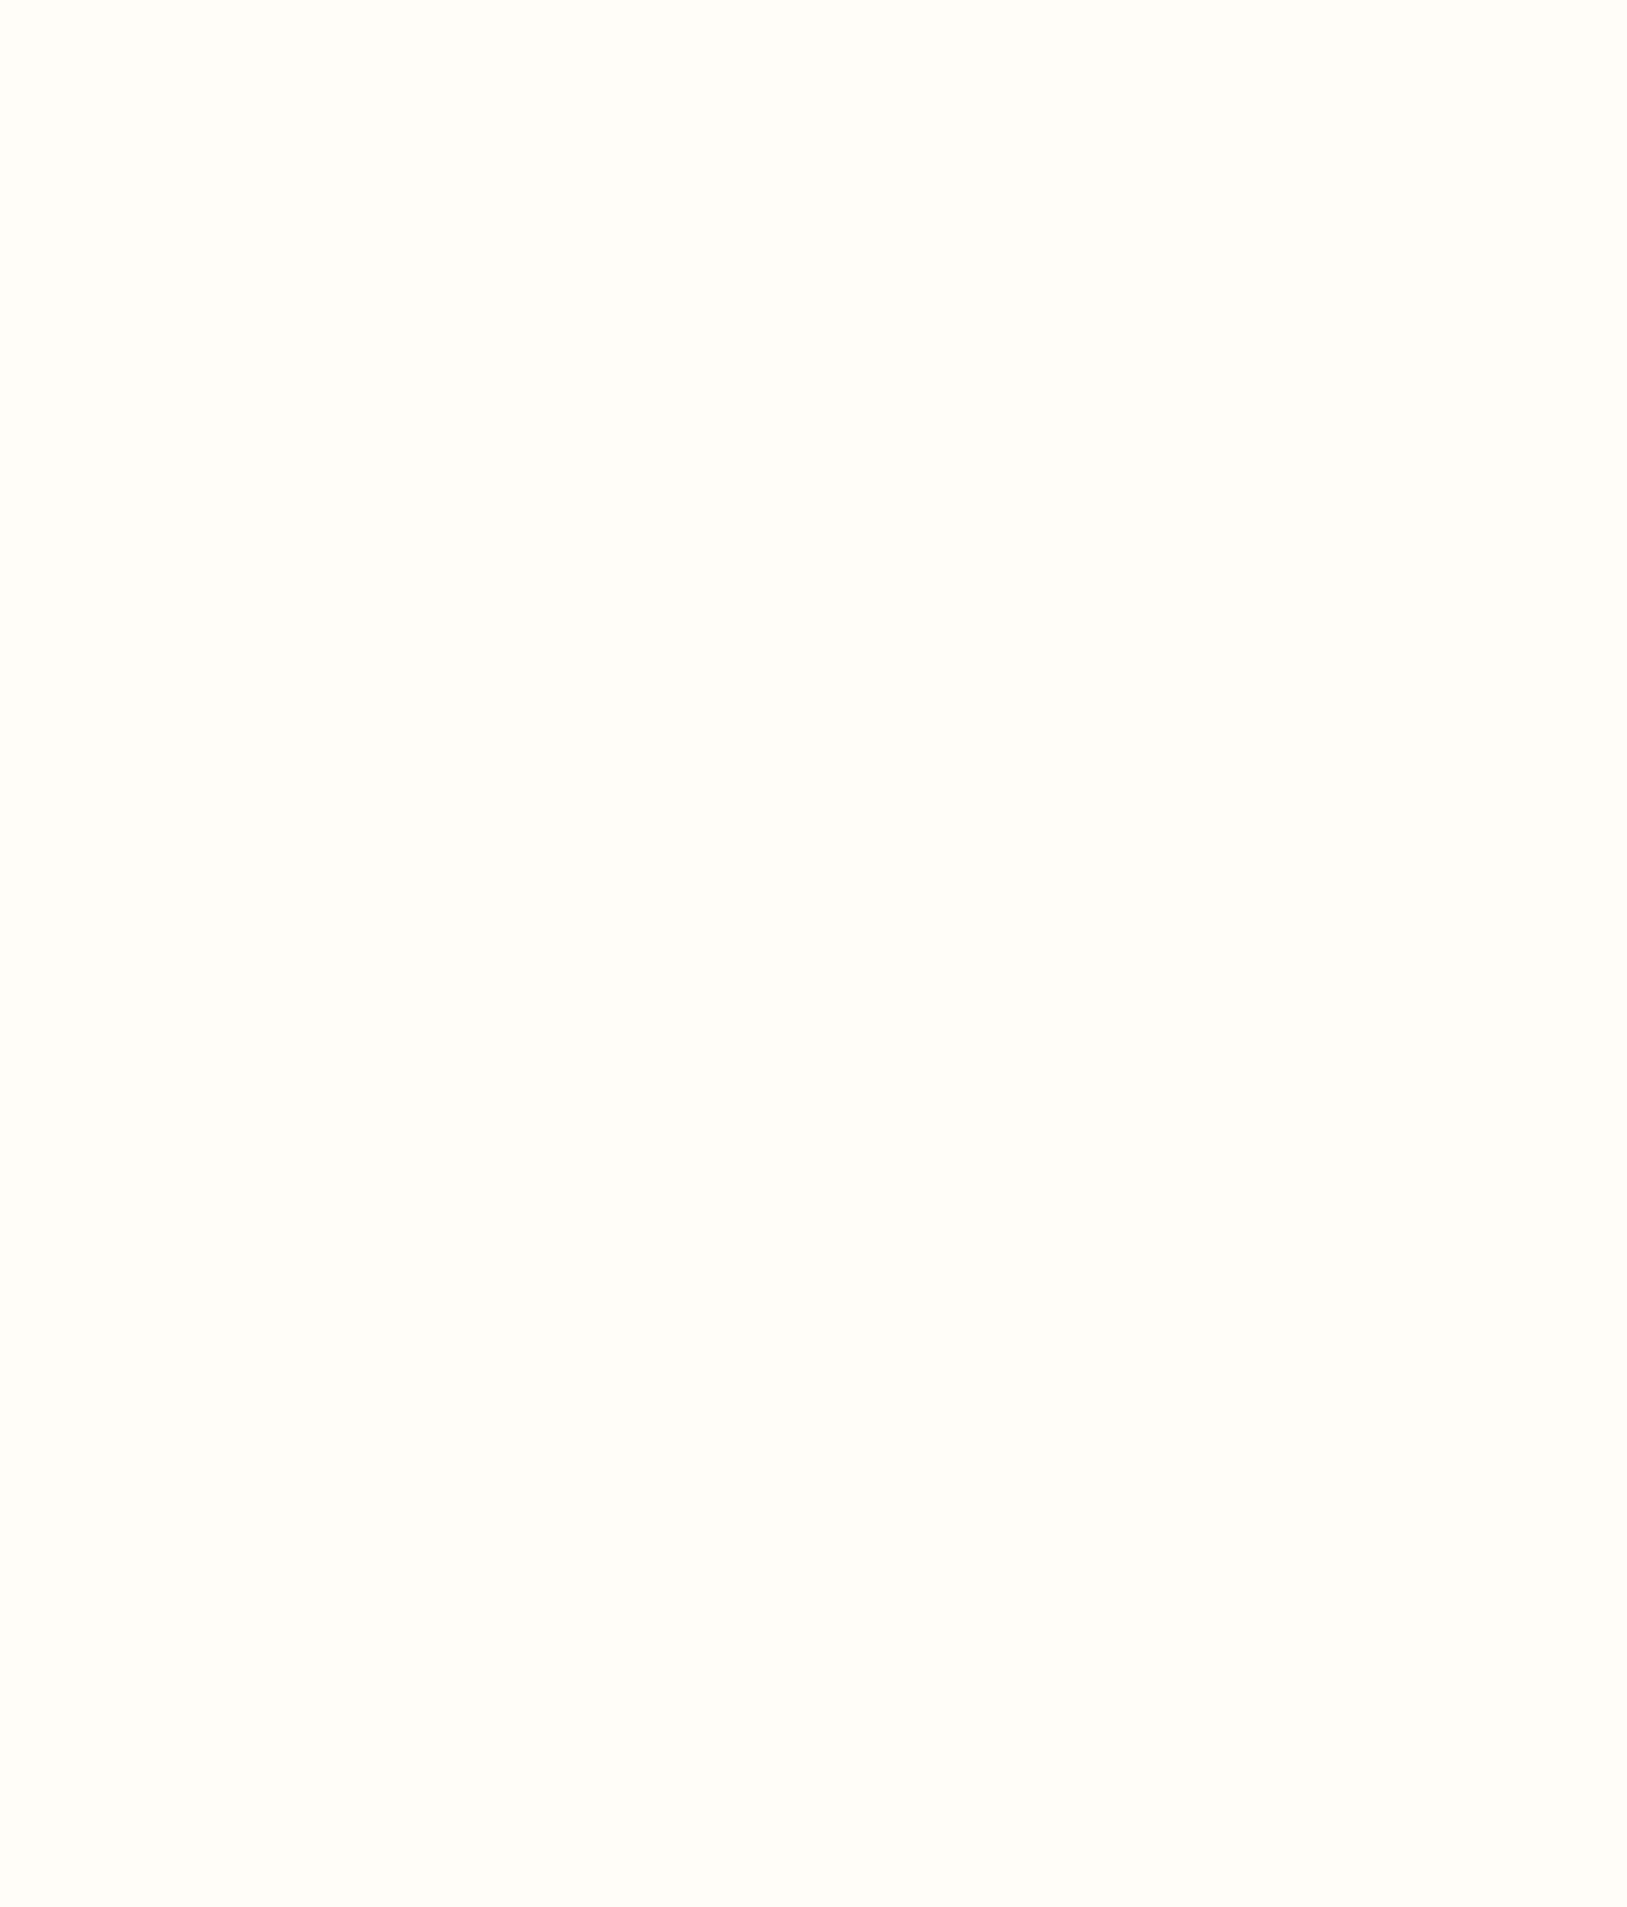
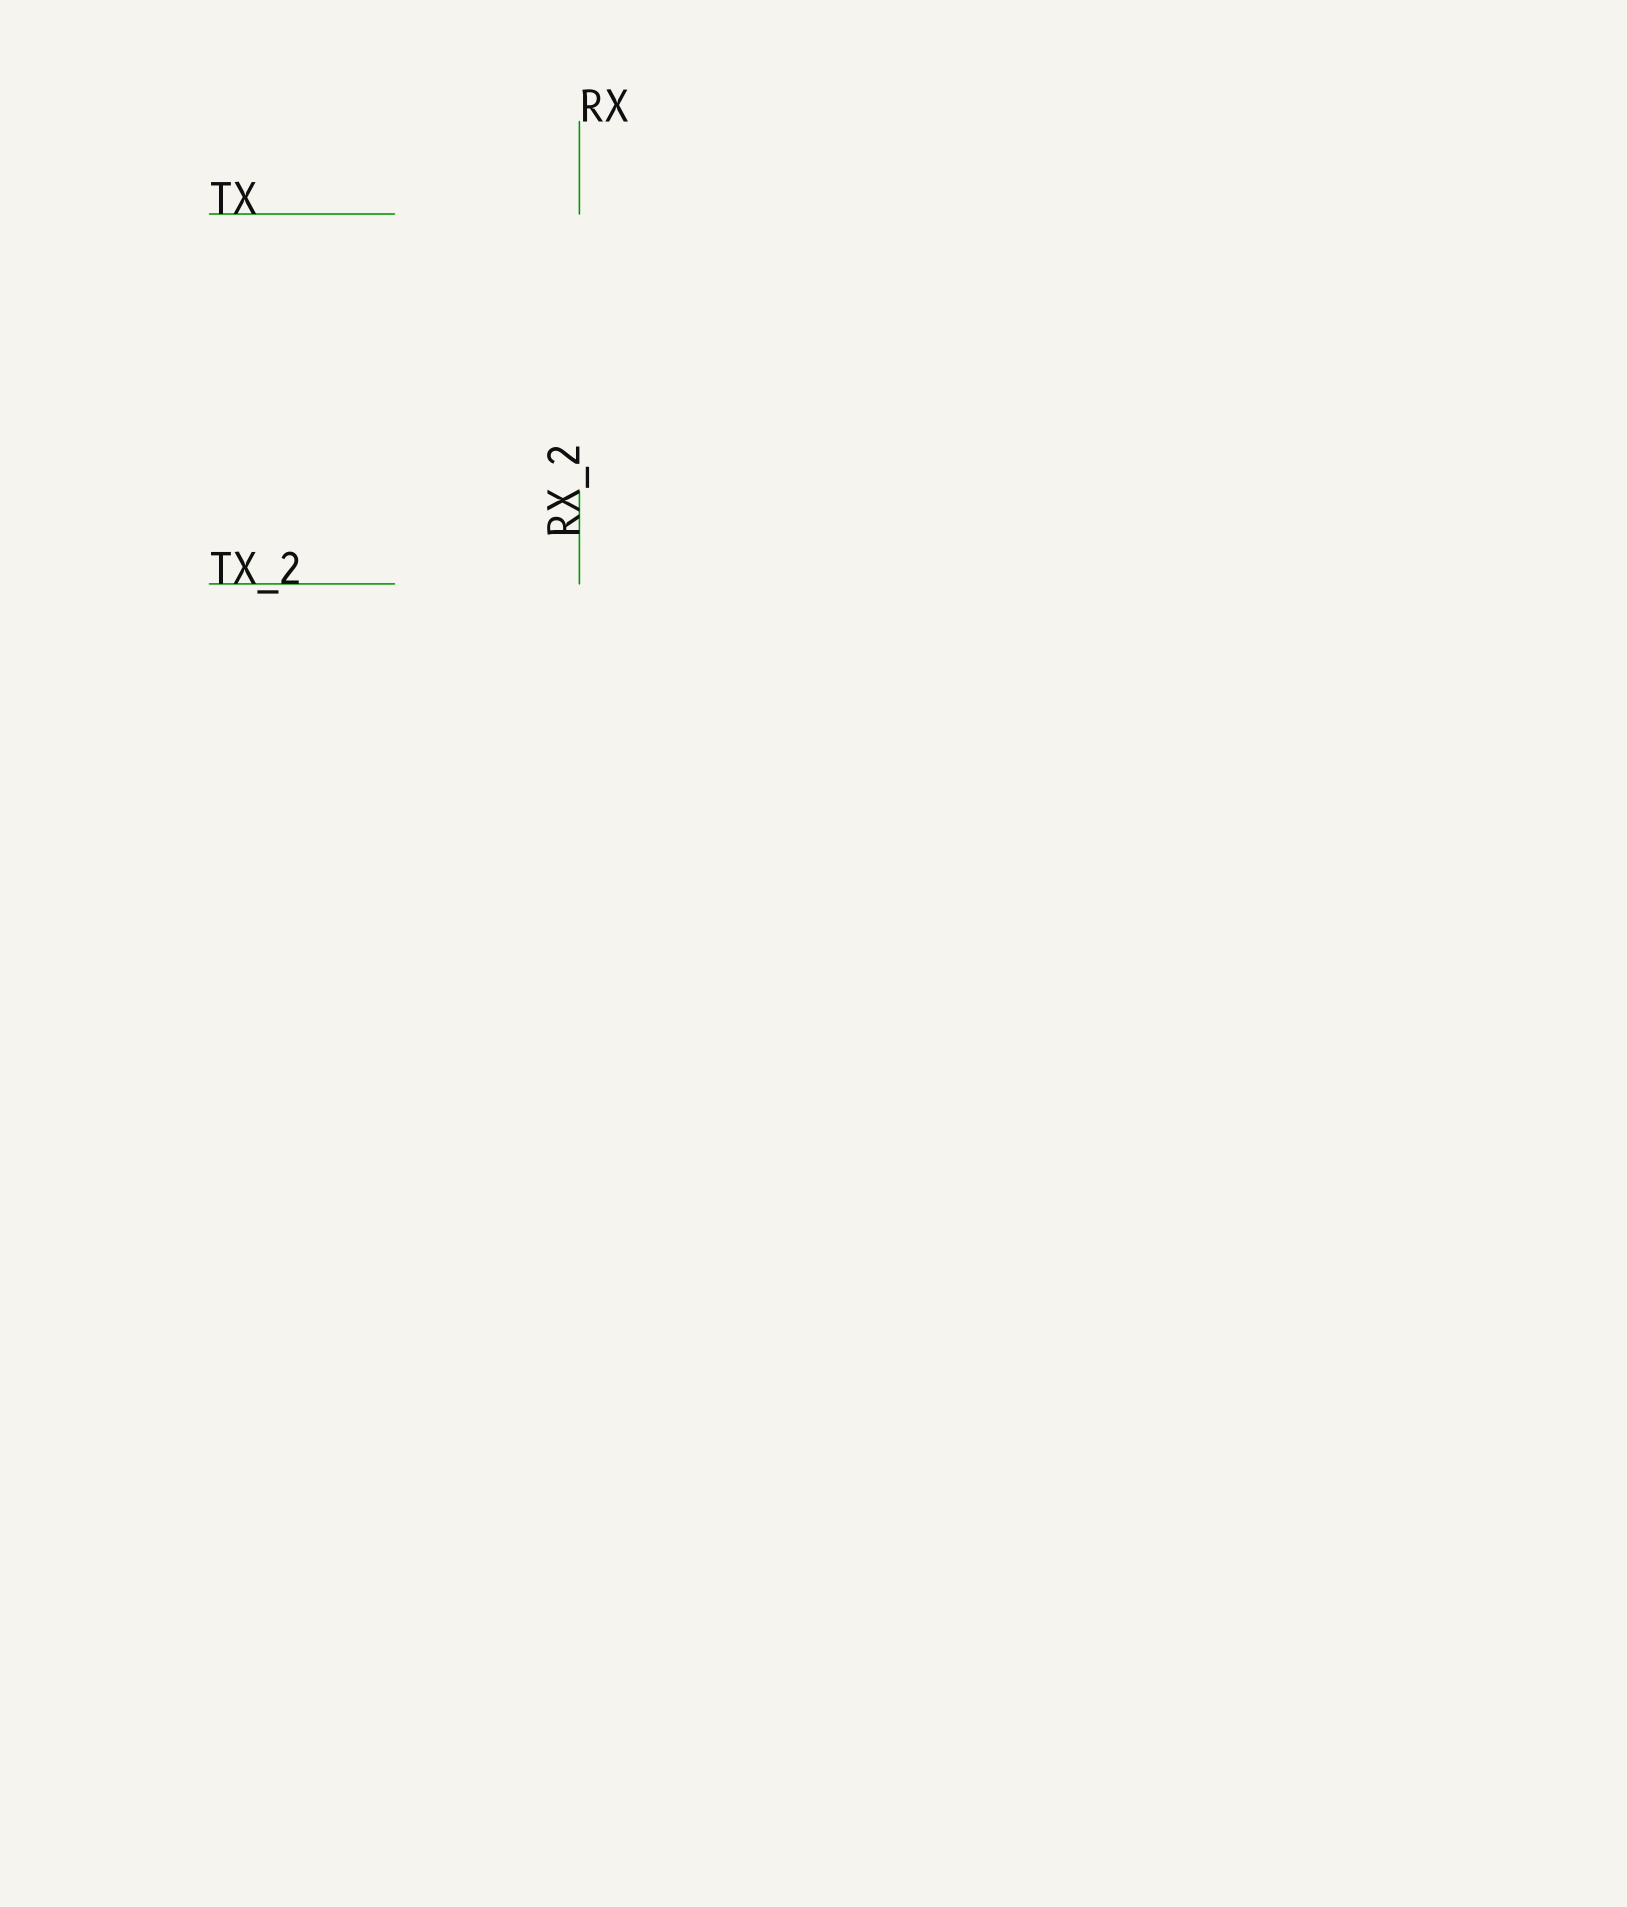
label: none -> RX (605, 105)
wire: none -> (579, 121) (579, 214)
label: none -> TX (233, 197)
wire: none -> (209, 214) (394, 214)
label: none -> RX_2 (568, 490)
wire: none -> (579, 491) (579, 583)
label: none -> TX_2 (254, 572)
wire: none -> (209, 583) (394, 583)

